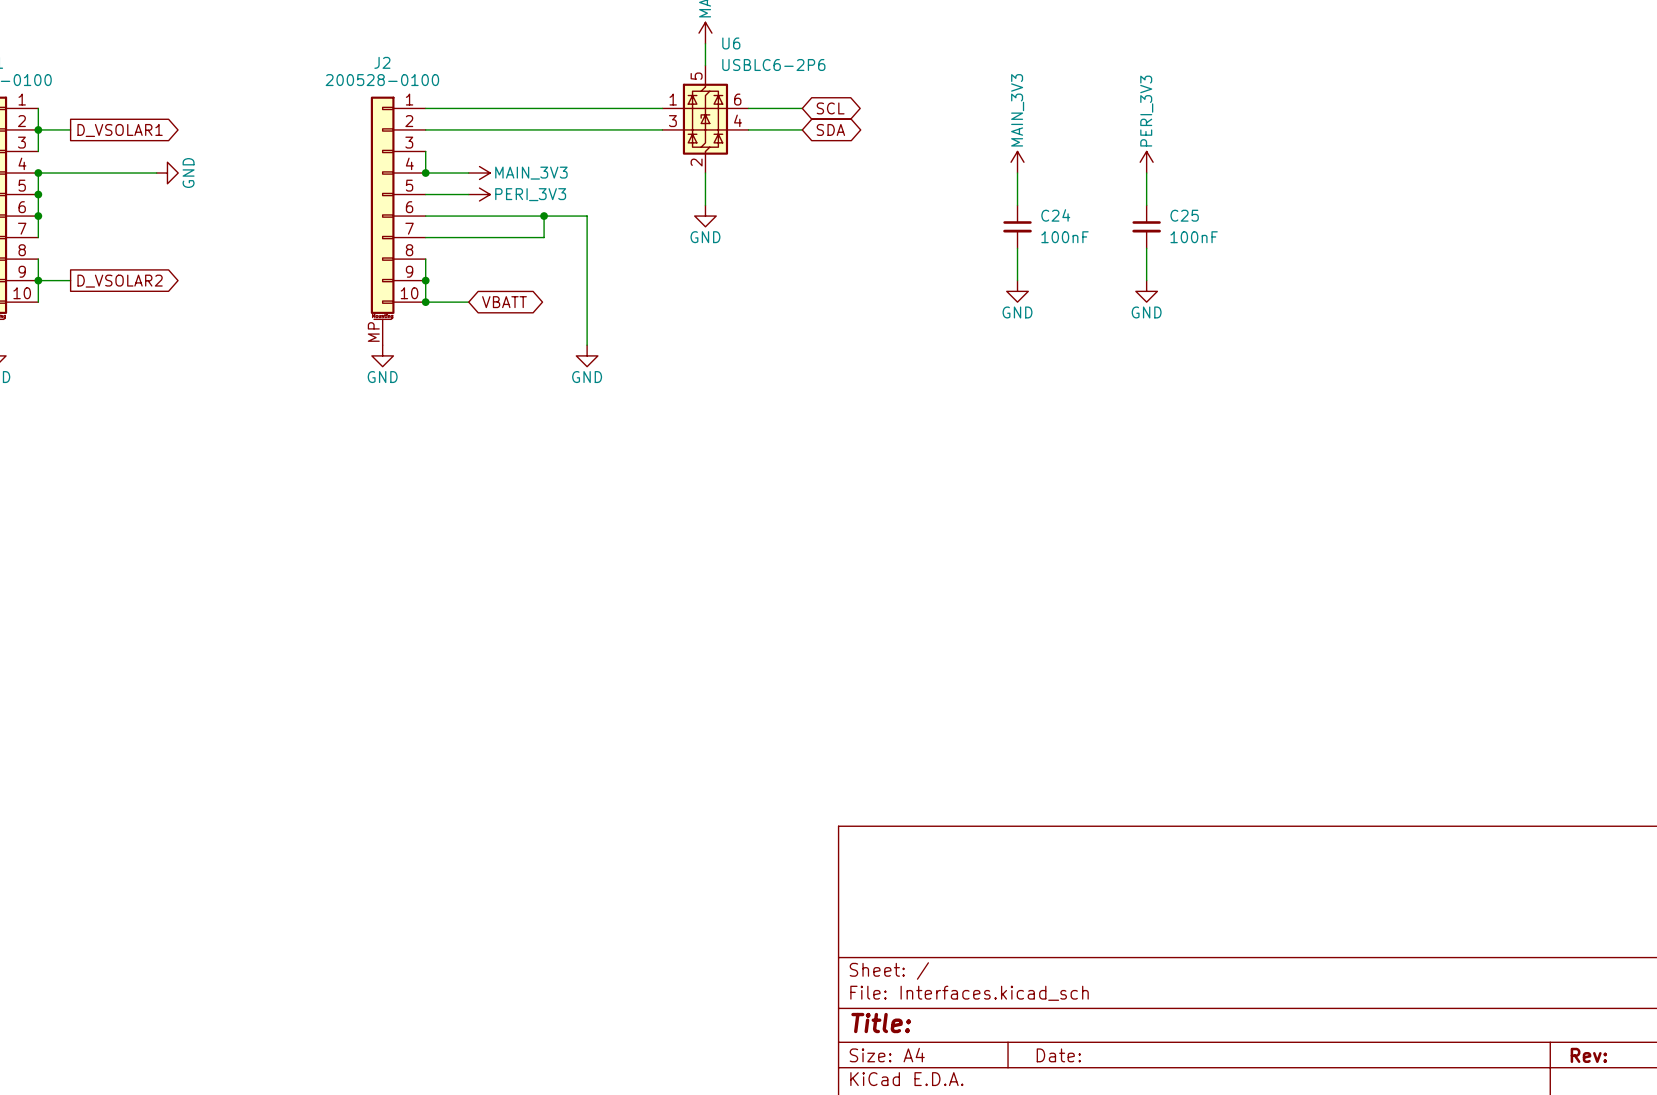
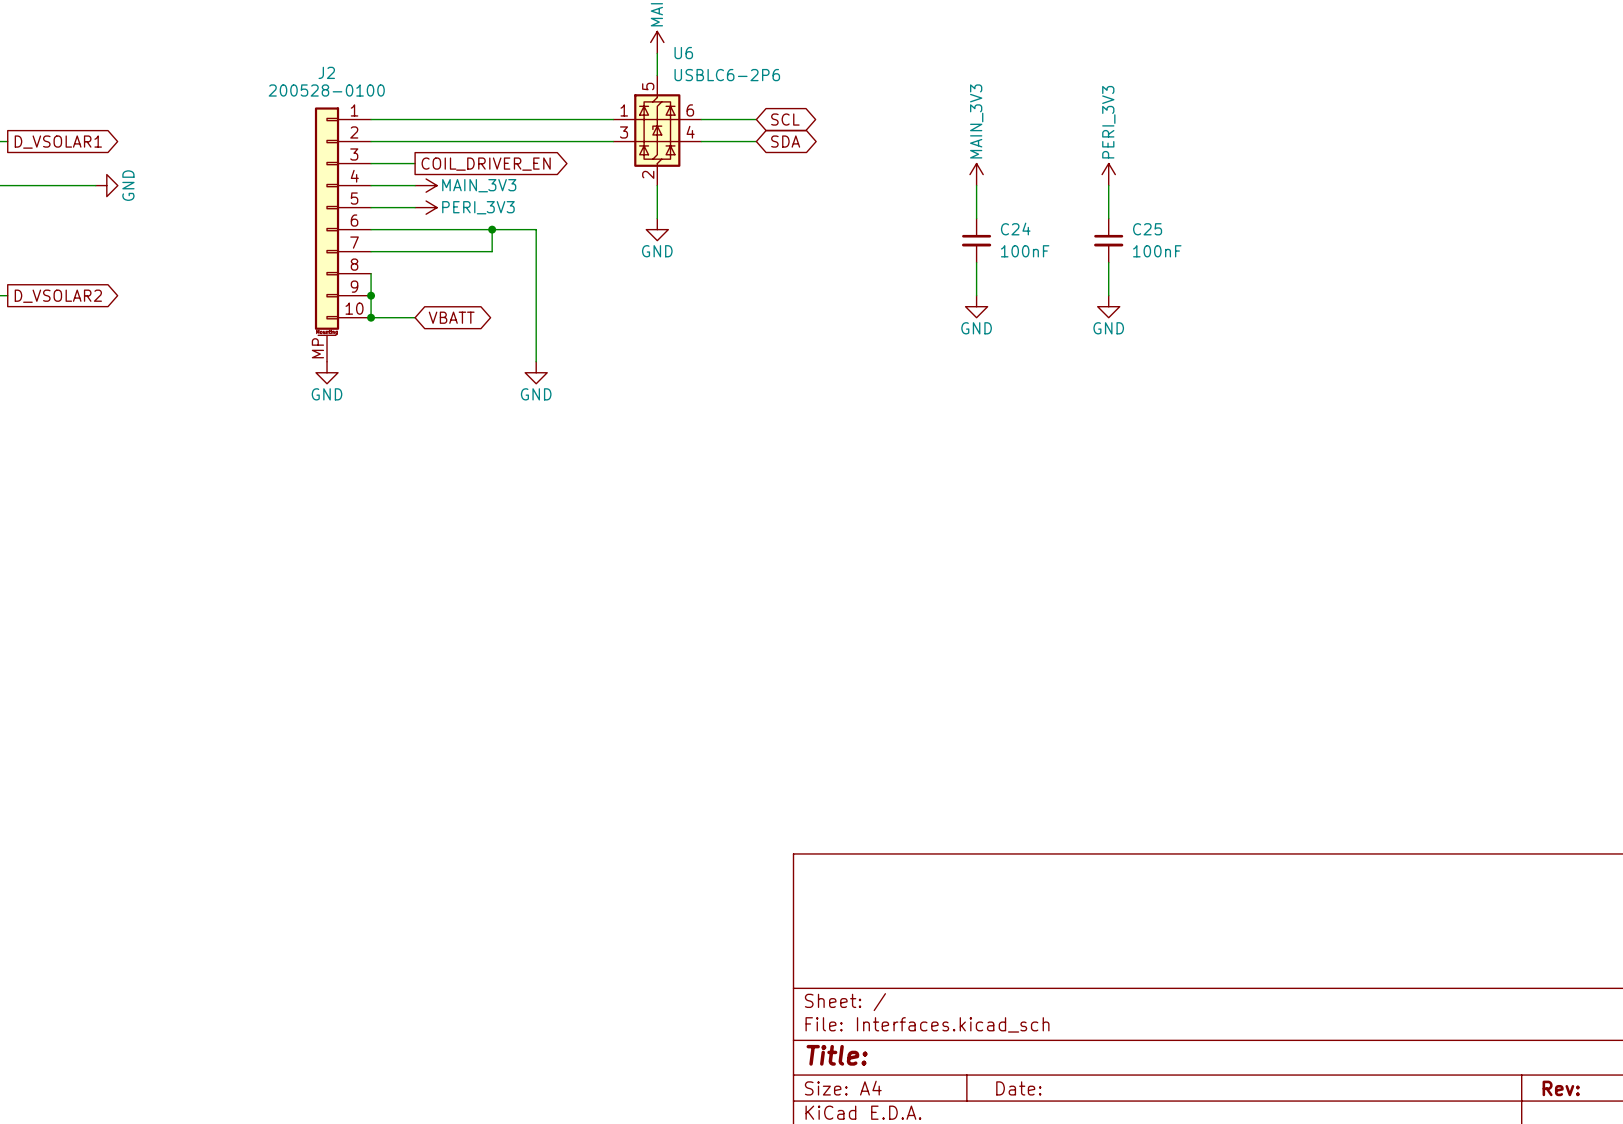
wire: (425, 151) (425, 173) -> (371, 163) (415, 163)
global label: none -> COIL_DRIVER_EN (486, 164)
junction: (425, 173) -> none

